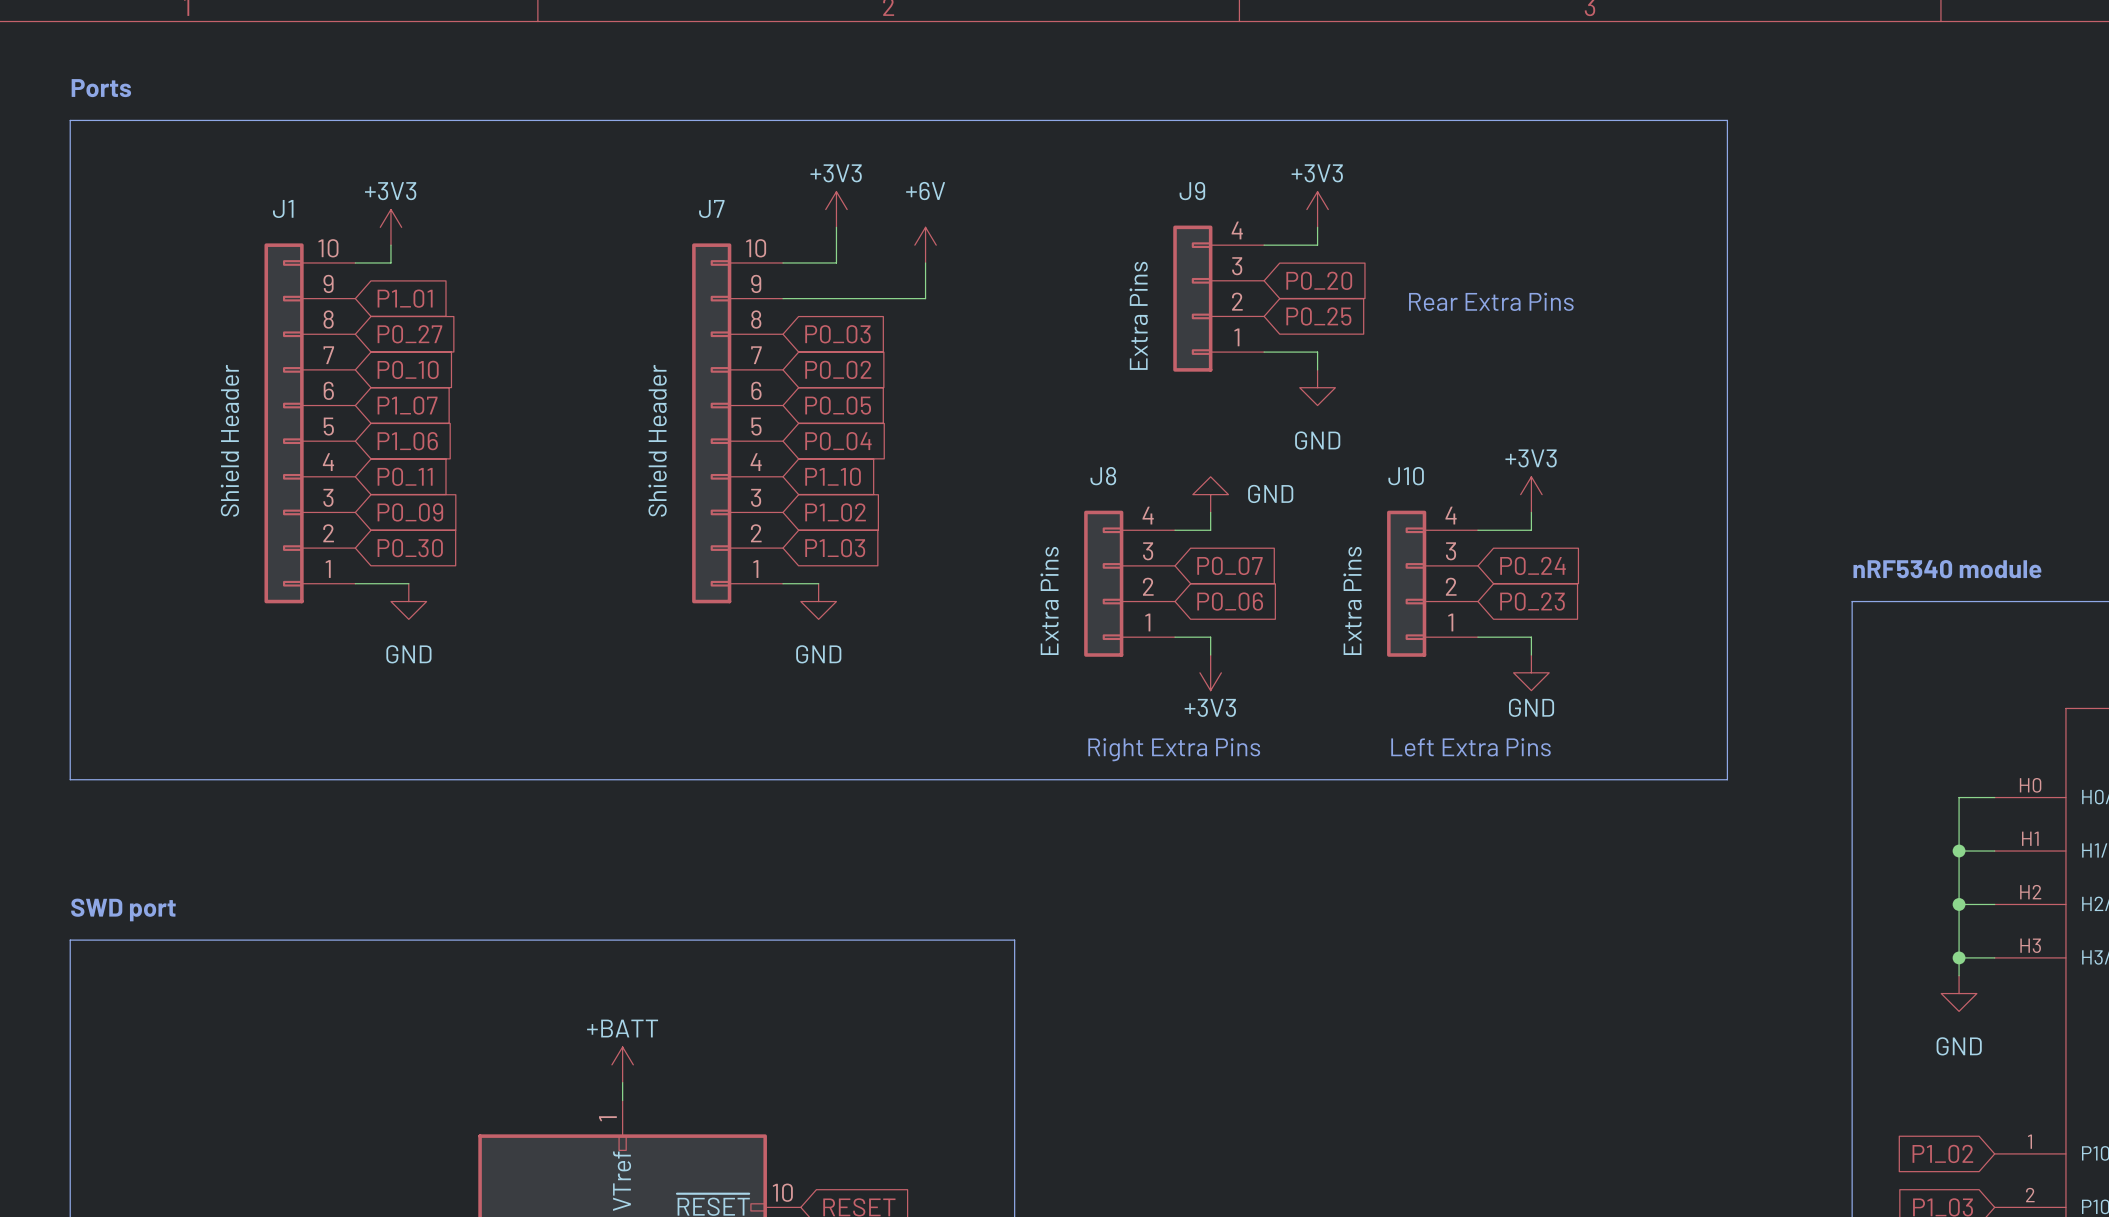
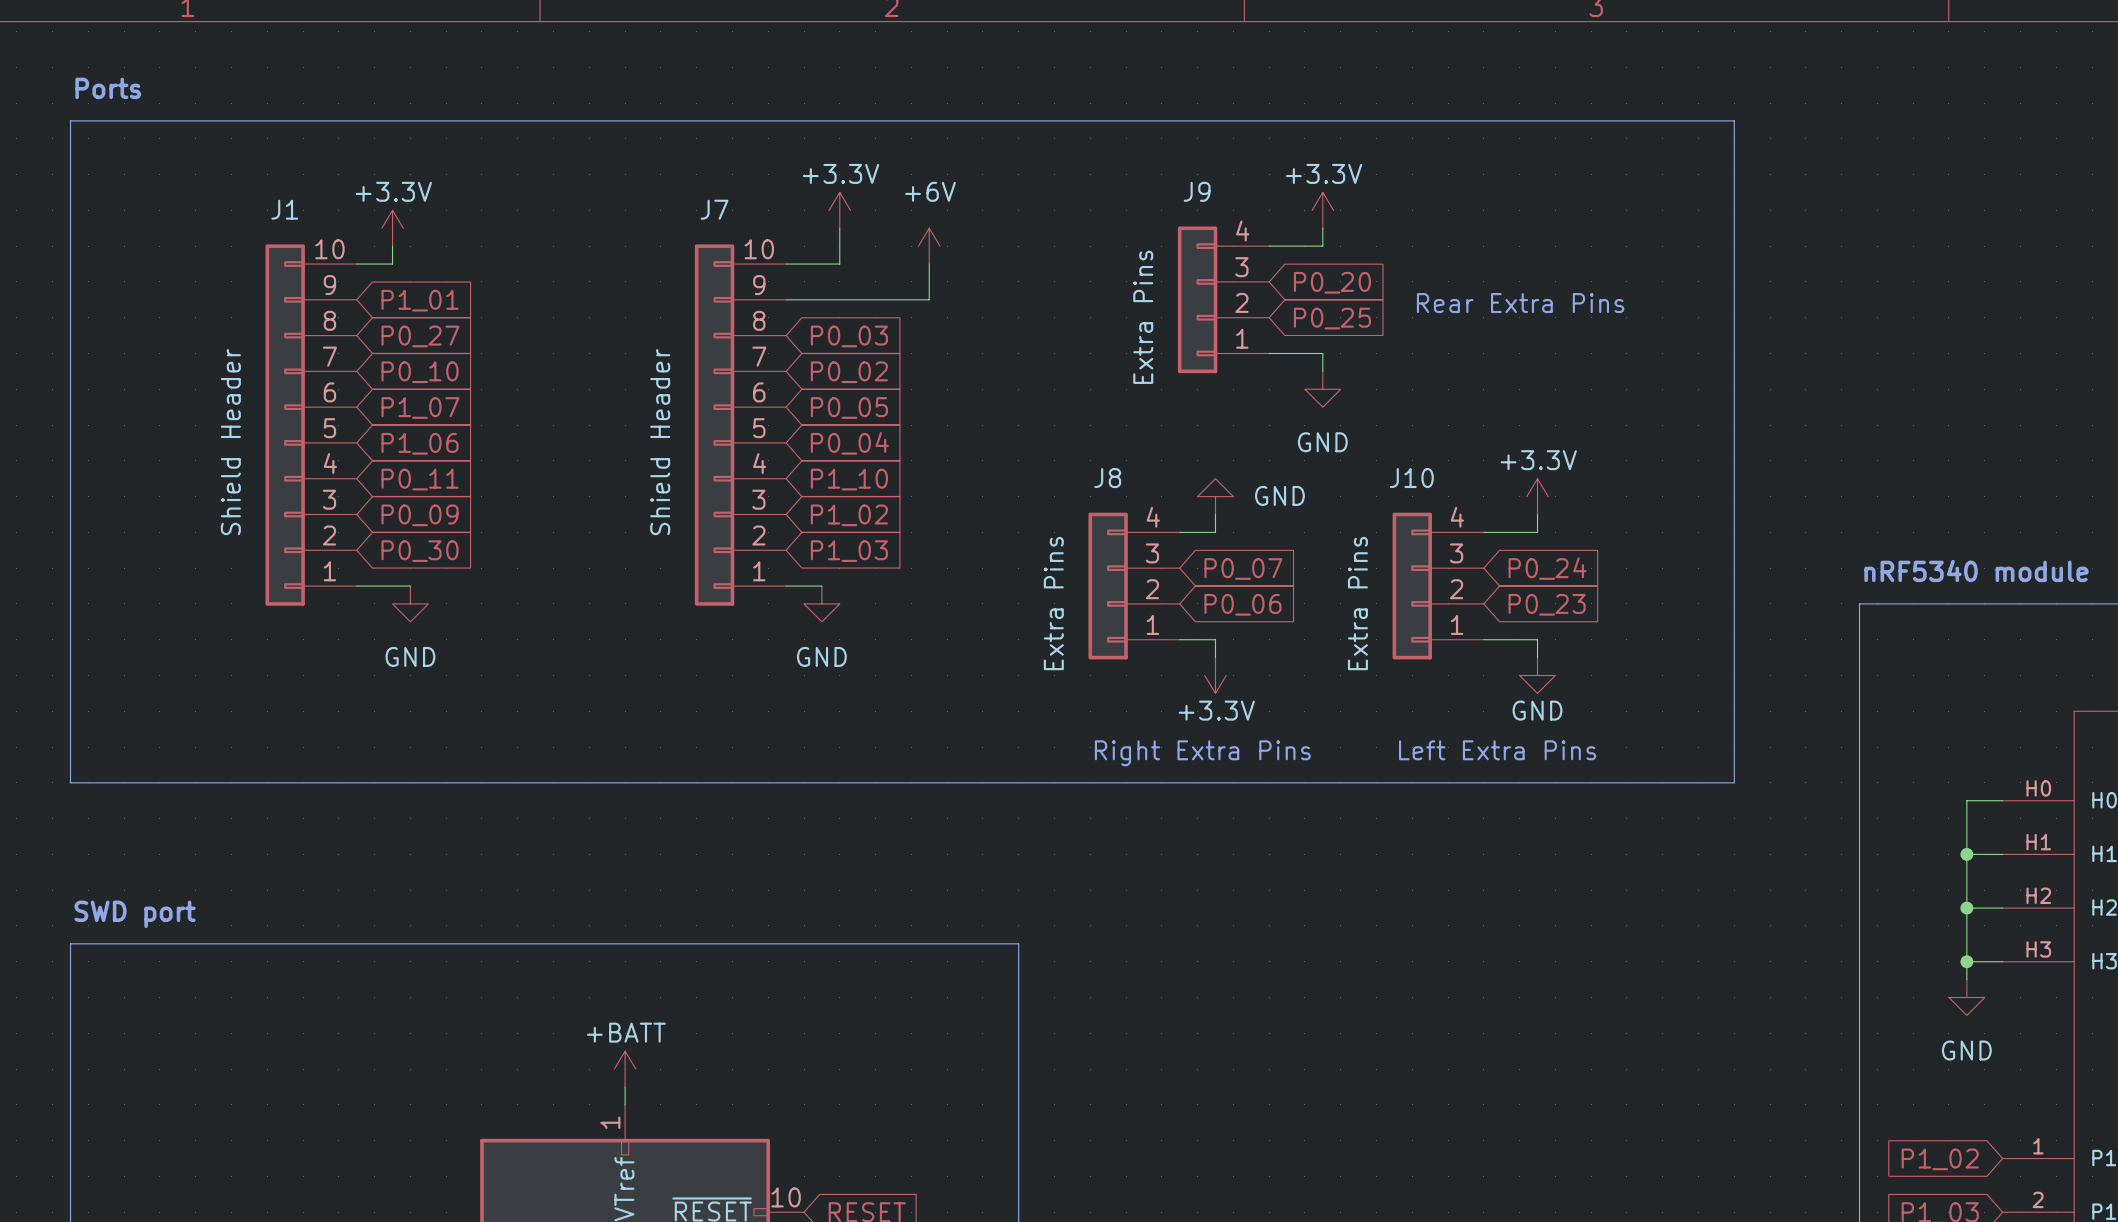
power symbol: +3V3 (836, 209) -> +3.3V (839, 210)
power symbol: +3V3 (1317, 209) -> +3.3V (1322, 210)
power symbol: +3V3 (390, 227) -> +3.3V (392, 228)
power symbol: +3V3 (1531, 494) -> +3.3V (1537, 496)
power symbol: +3V3 (1210, 672) -> +3.3V (1215, 675)

